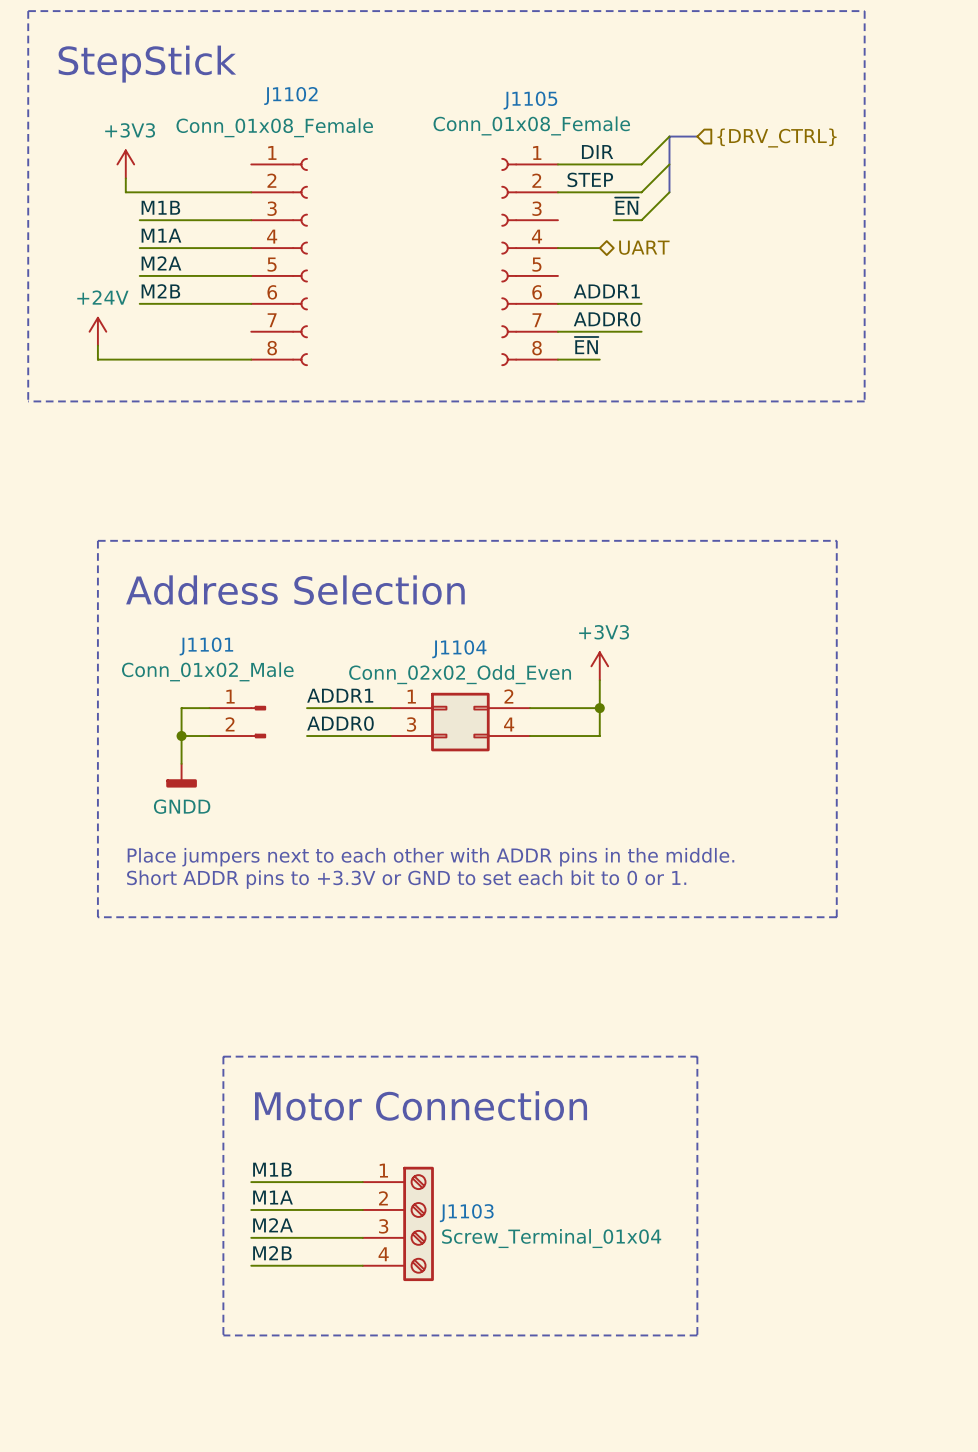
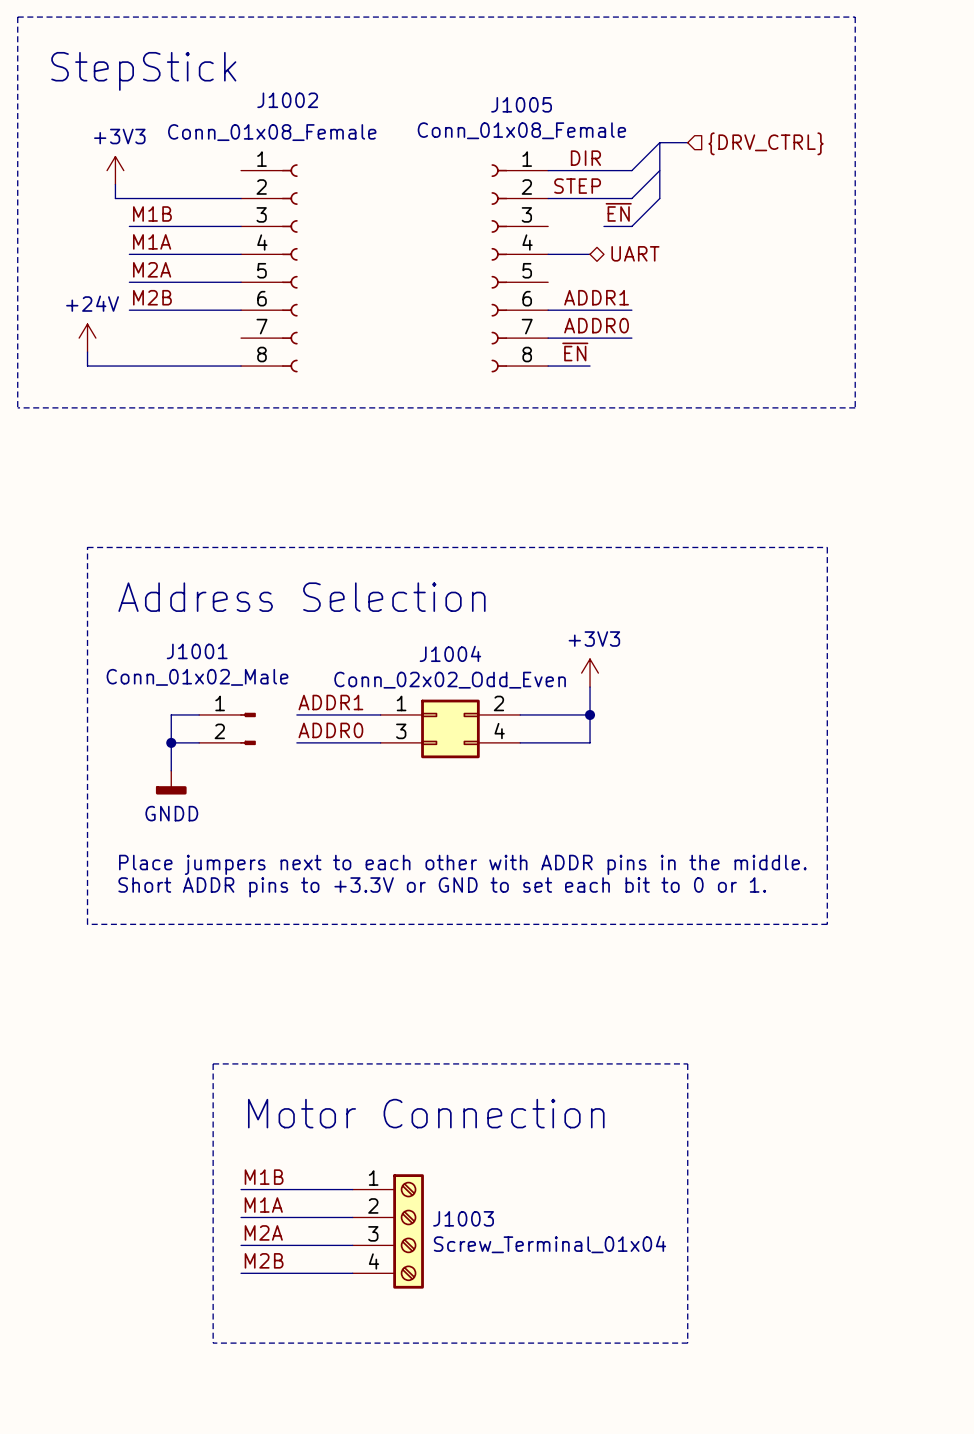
J1102 name: J1102 (290, 96) -> J1002 (287, 100)
J1105 name: J1105 (530, 100) -> J1005 (521, 104)
J1101 name: J1101 (206, 646) -> J1001 (197, 651)
J1104 name: J1104 (459, 649) -> J1004 (450, 653)
J1103 name: J1103 (466, 1213) -> J1003 (463, 1218)

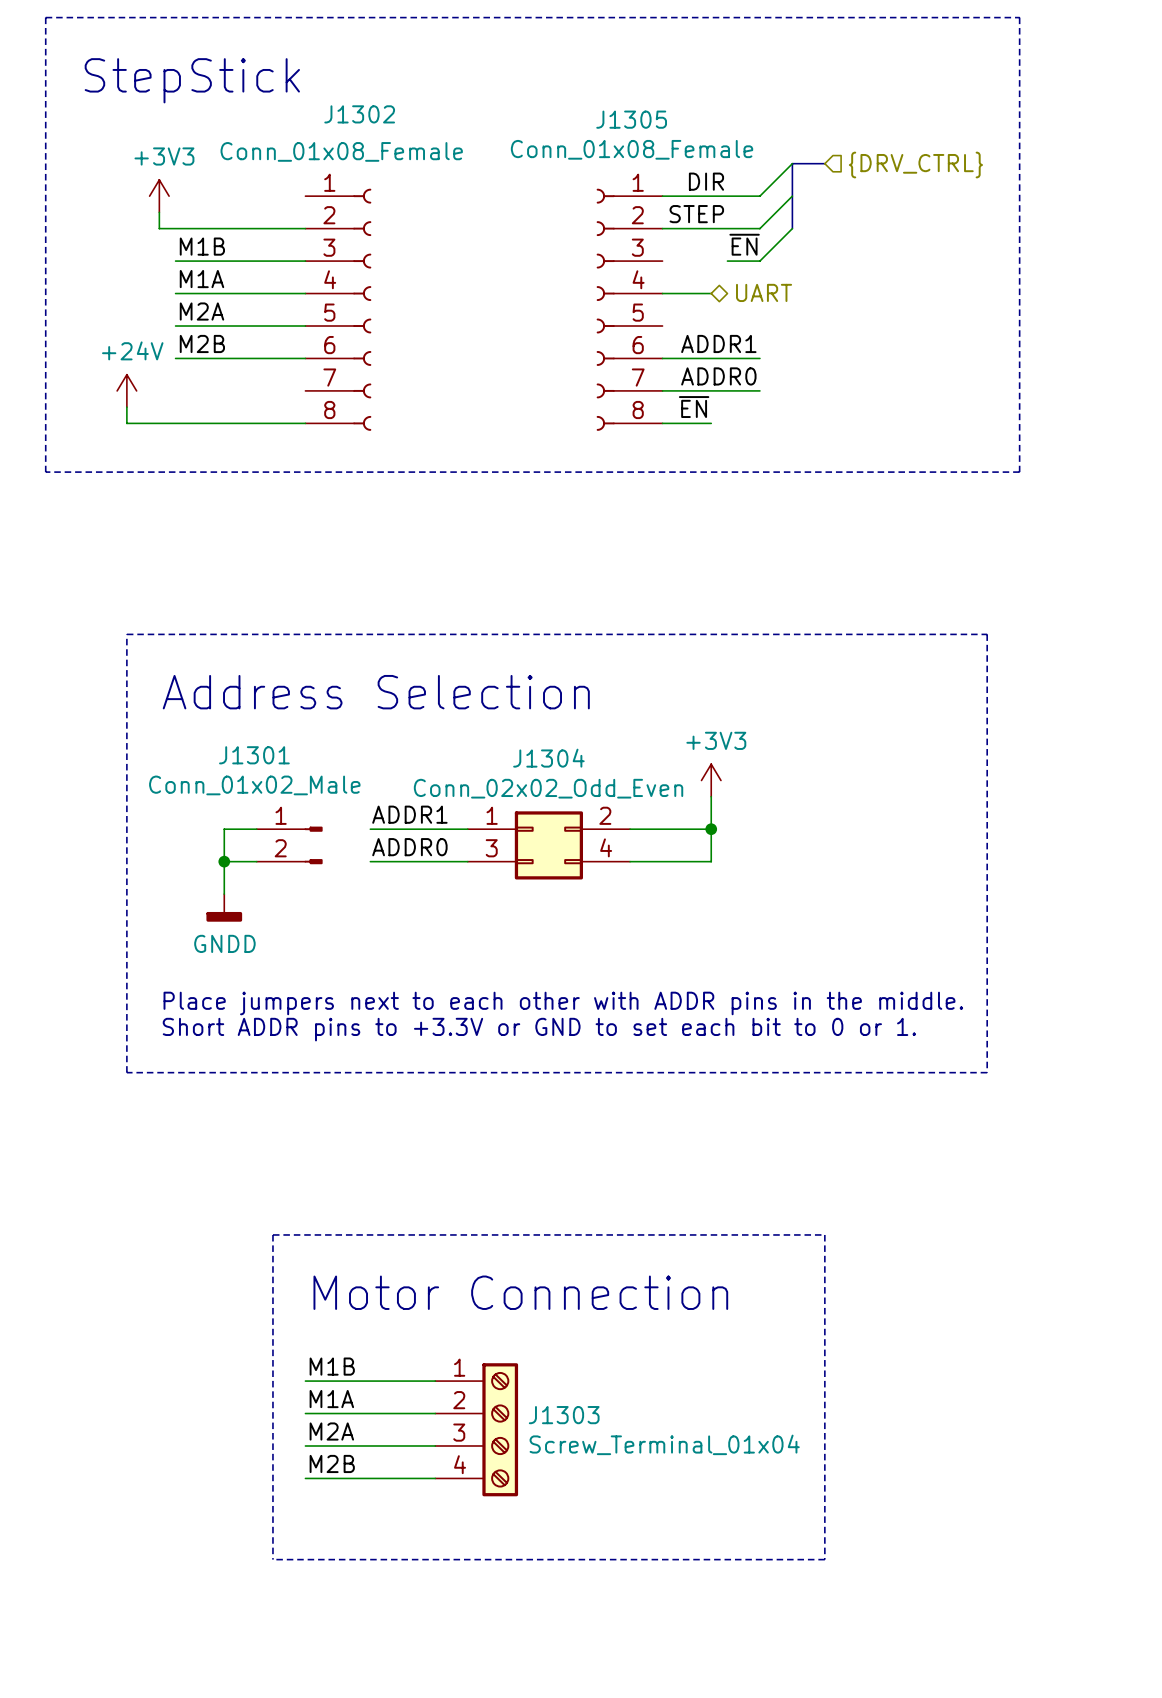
J1002 name: J1002 (287, 100) -> J1302 (359, 114)
J1005 name: J1005 (521, 104) -> J1305 (631, 119)
J1001 name: J1001 (197, 651) -> J1301 (254, 755)
J1004 name: J1004 (450, 653) -> J1304 (548, 758)
J1003 name: J1003 (463, 1218) -> J1303 (564, 1415)

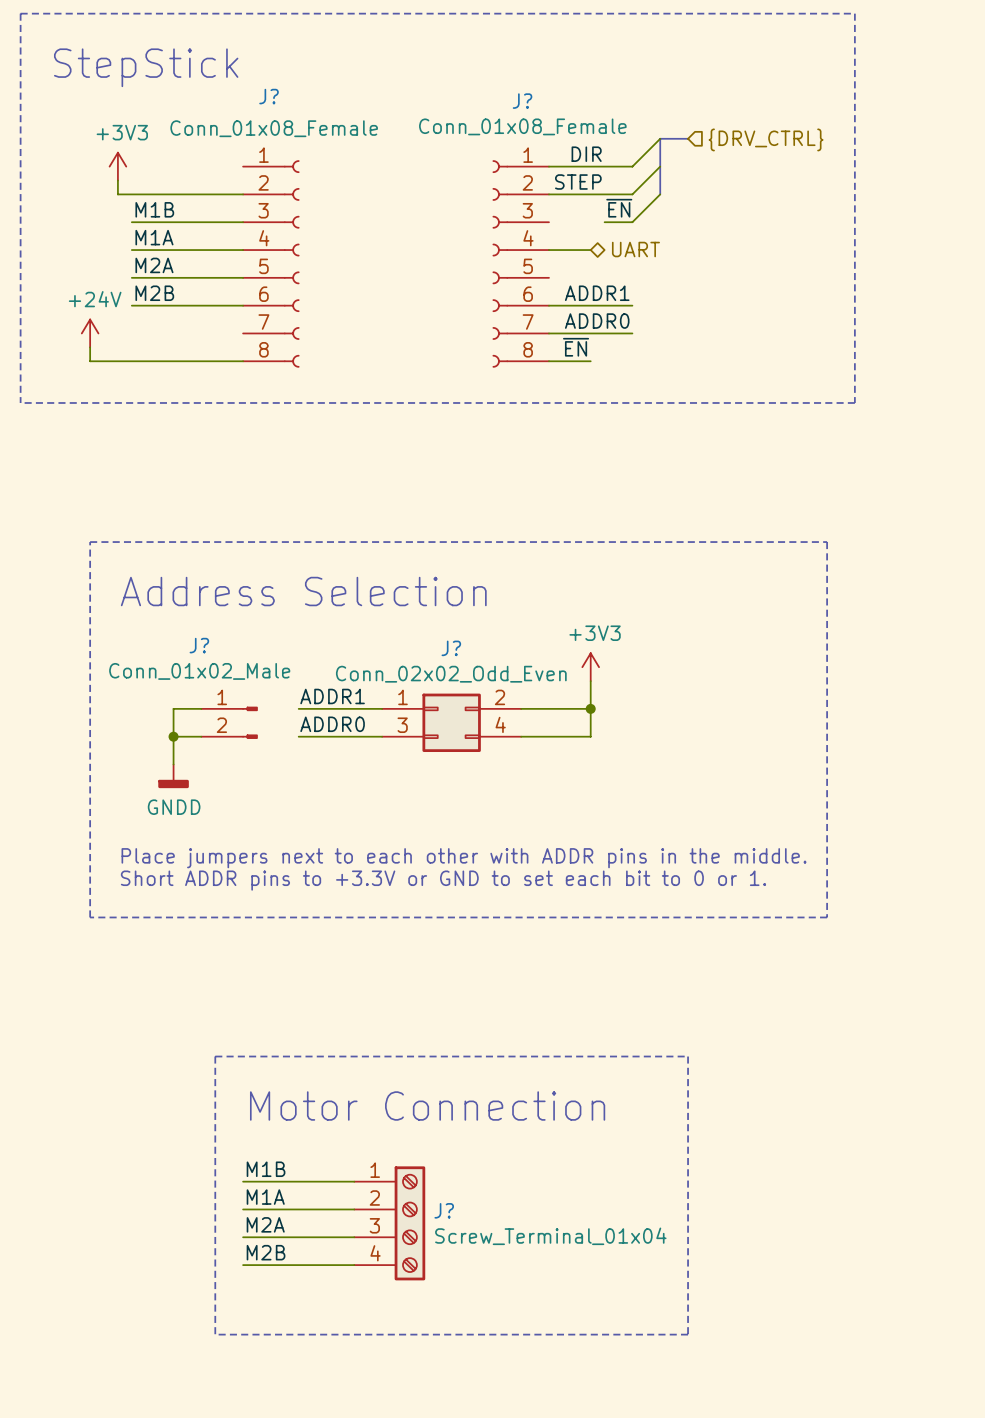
J1302 name: J1302 (359, 114) -> J? (269, 96)
J1305 name: J1305 (631, 119) -> J? (522, 101)
J1301 name: J1301 (254, 755) -> J? (199, 645)
J1304 name: J1304 (548, 758) -> J? (451, 648)
J1303 name: J1303 (564, 1415) -> J? (444, 1210)

